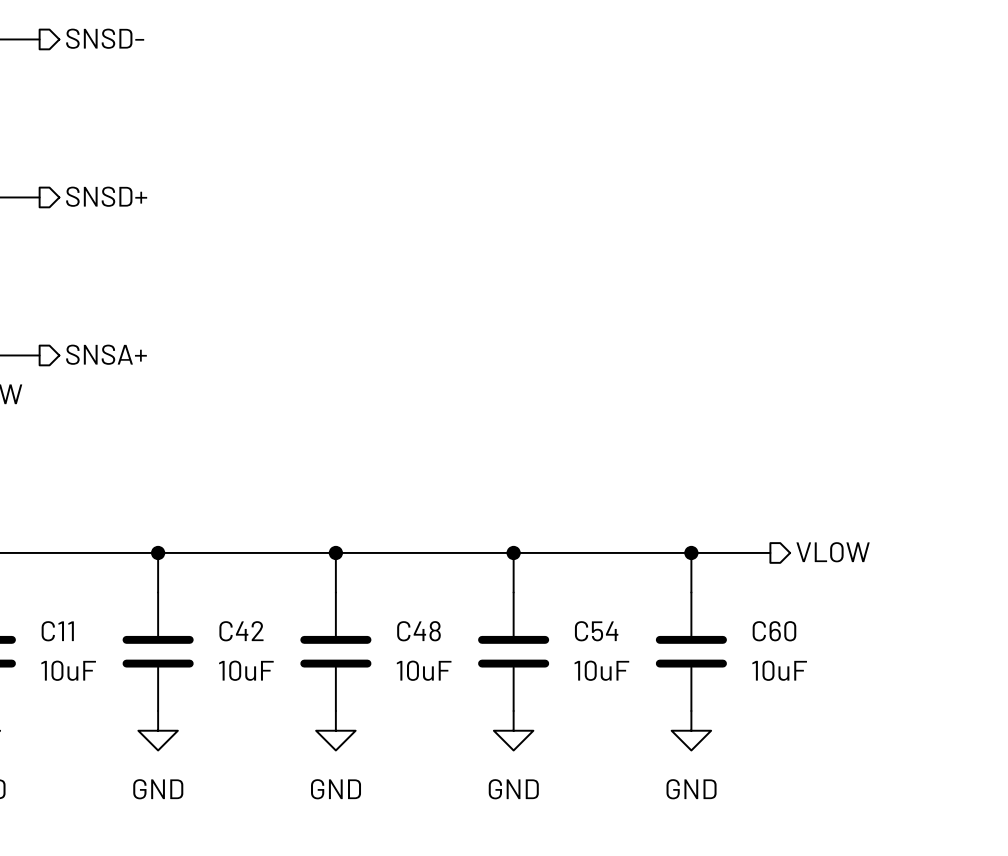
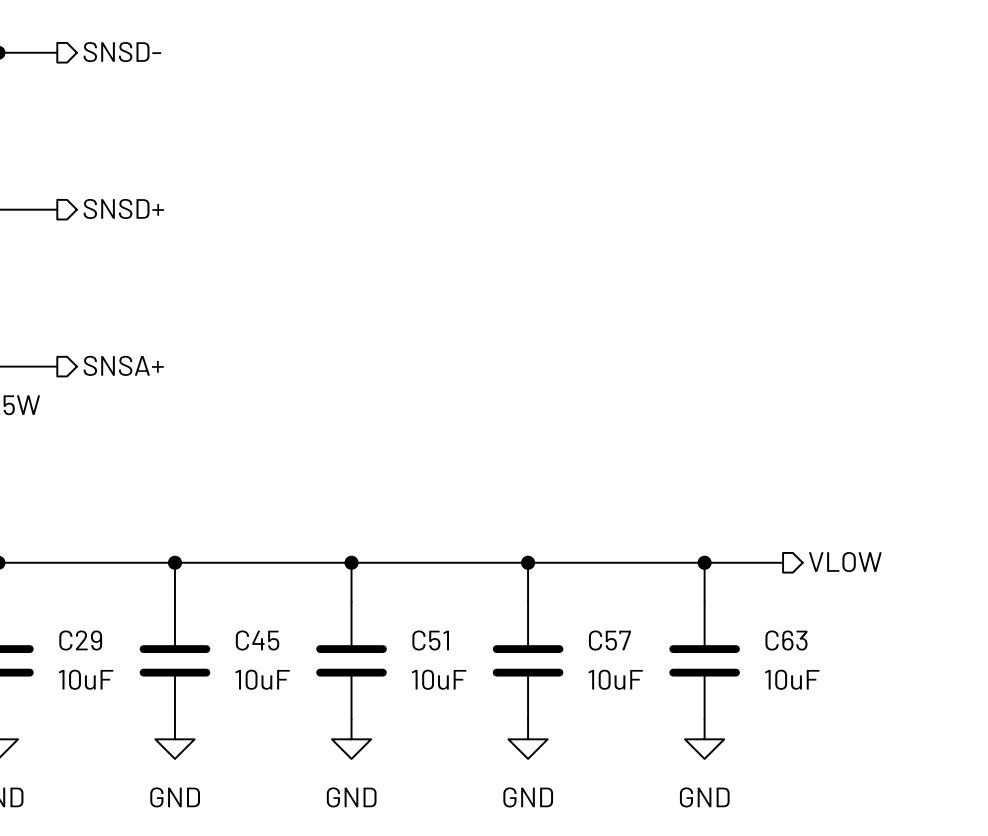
C11 name: C11 (57, 631) -> C29 (80, 640)
C42 name: C42 (241, 631) -> C45 (257, 640)
C48 name: C48 (418, 631) -> C51 (430, 640)
C54 name: C54 (596, 631) -> C57 (609, 640)
C60 name: C60 (774, 631) -> C63 (786, 640)

